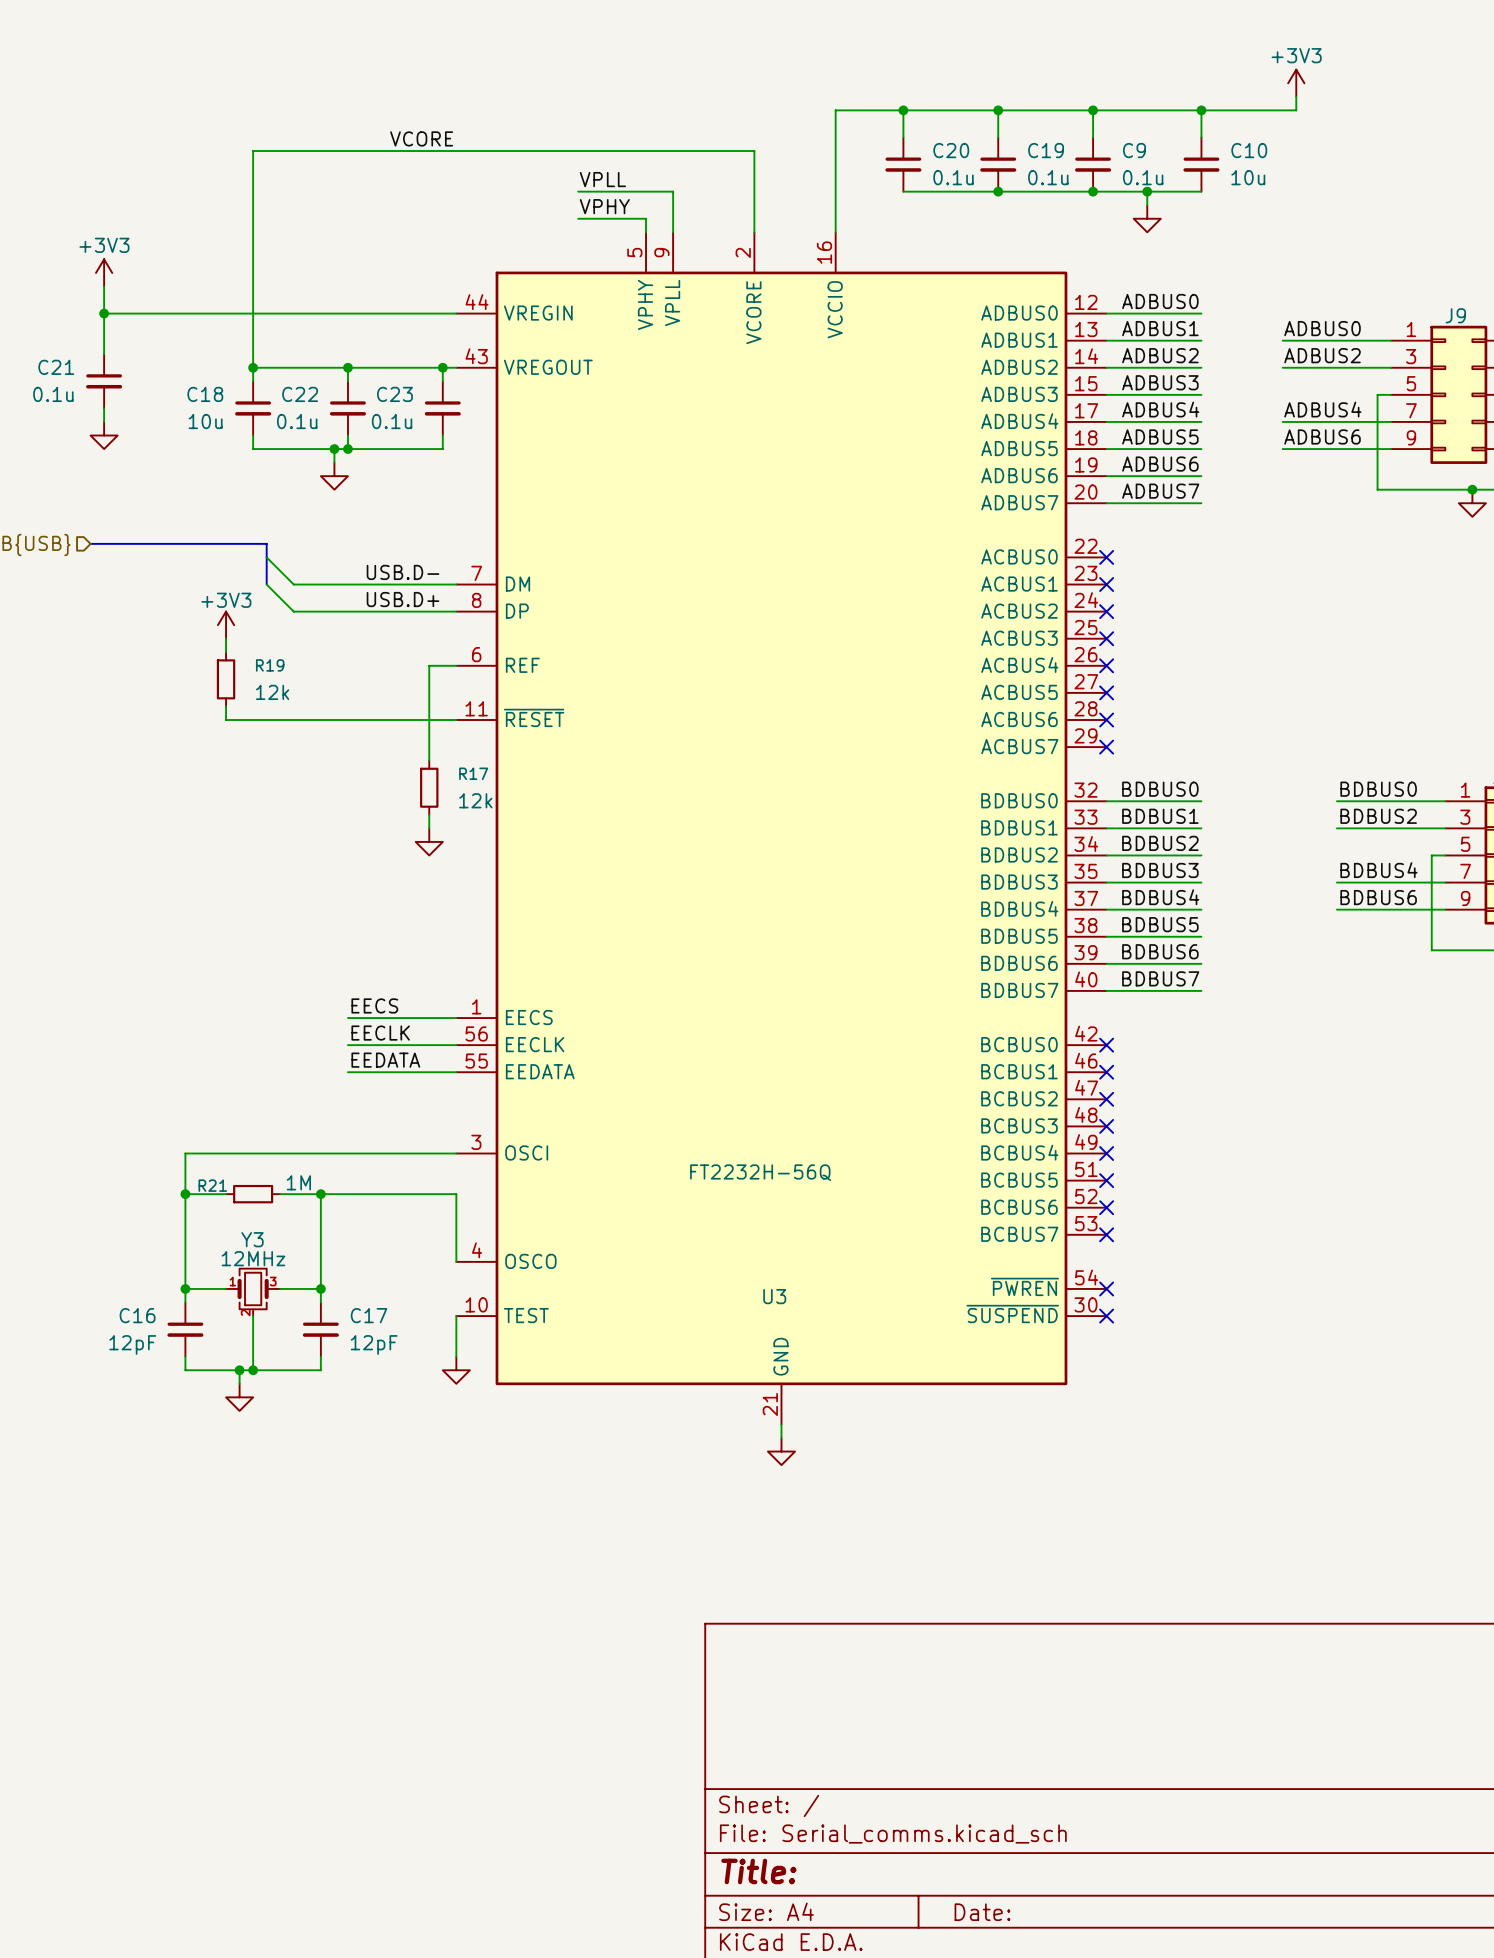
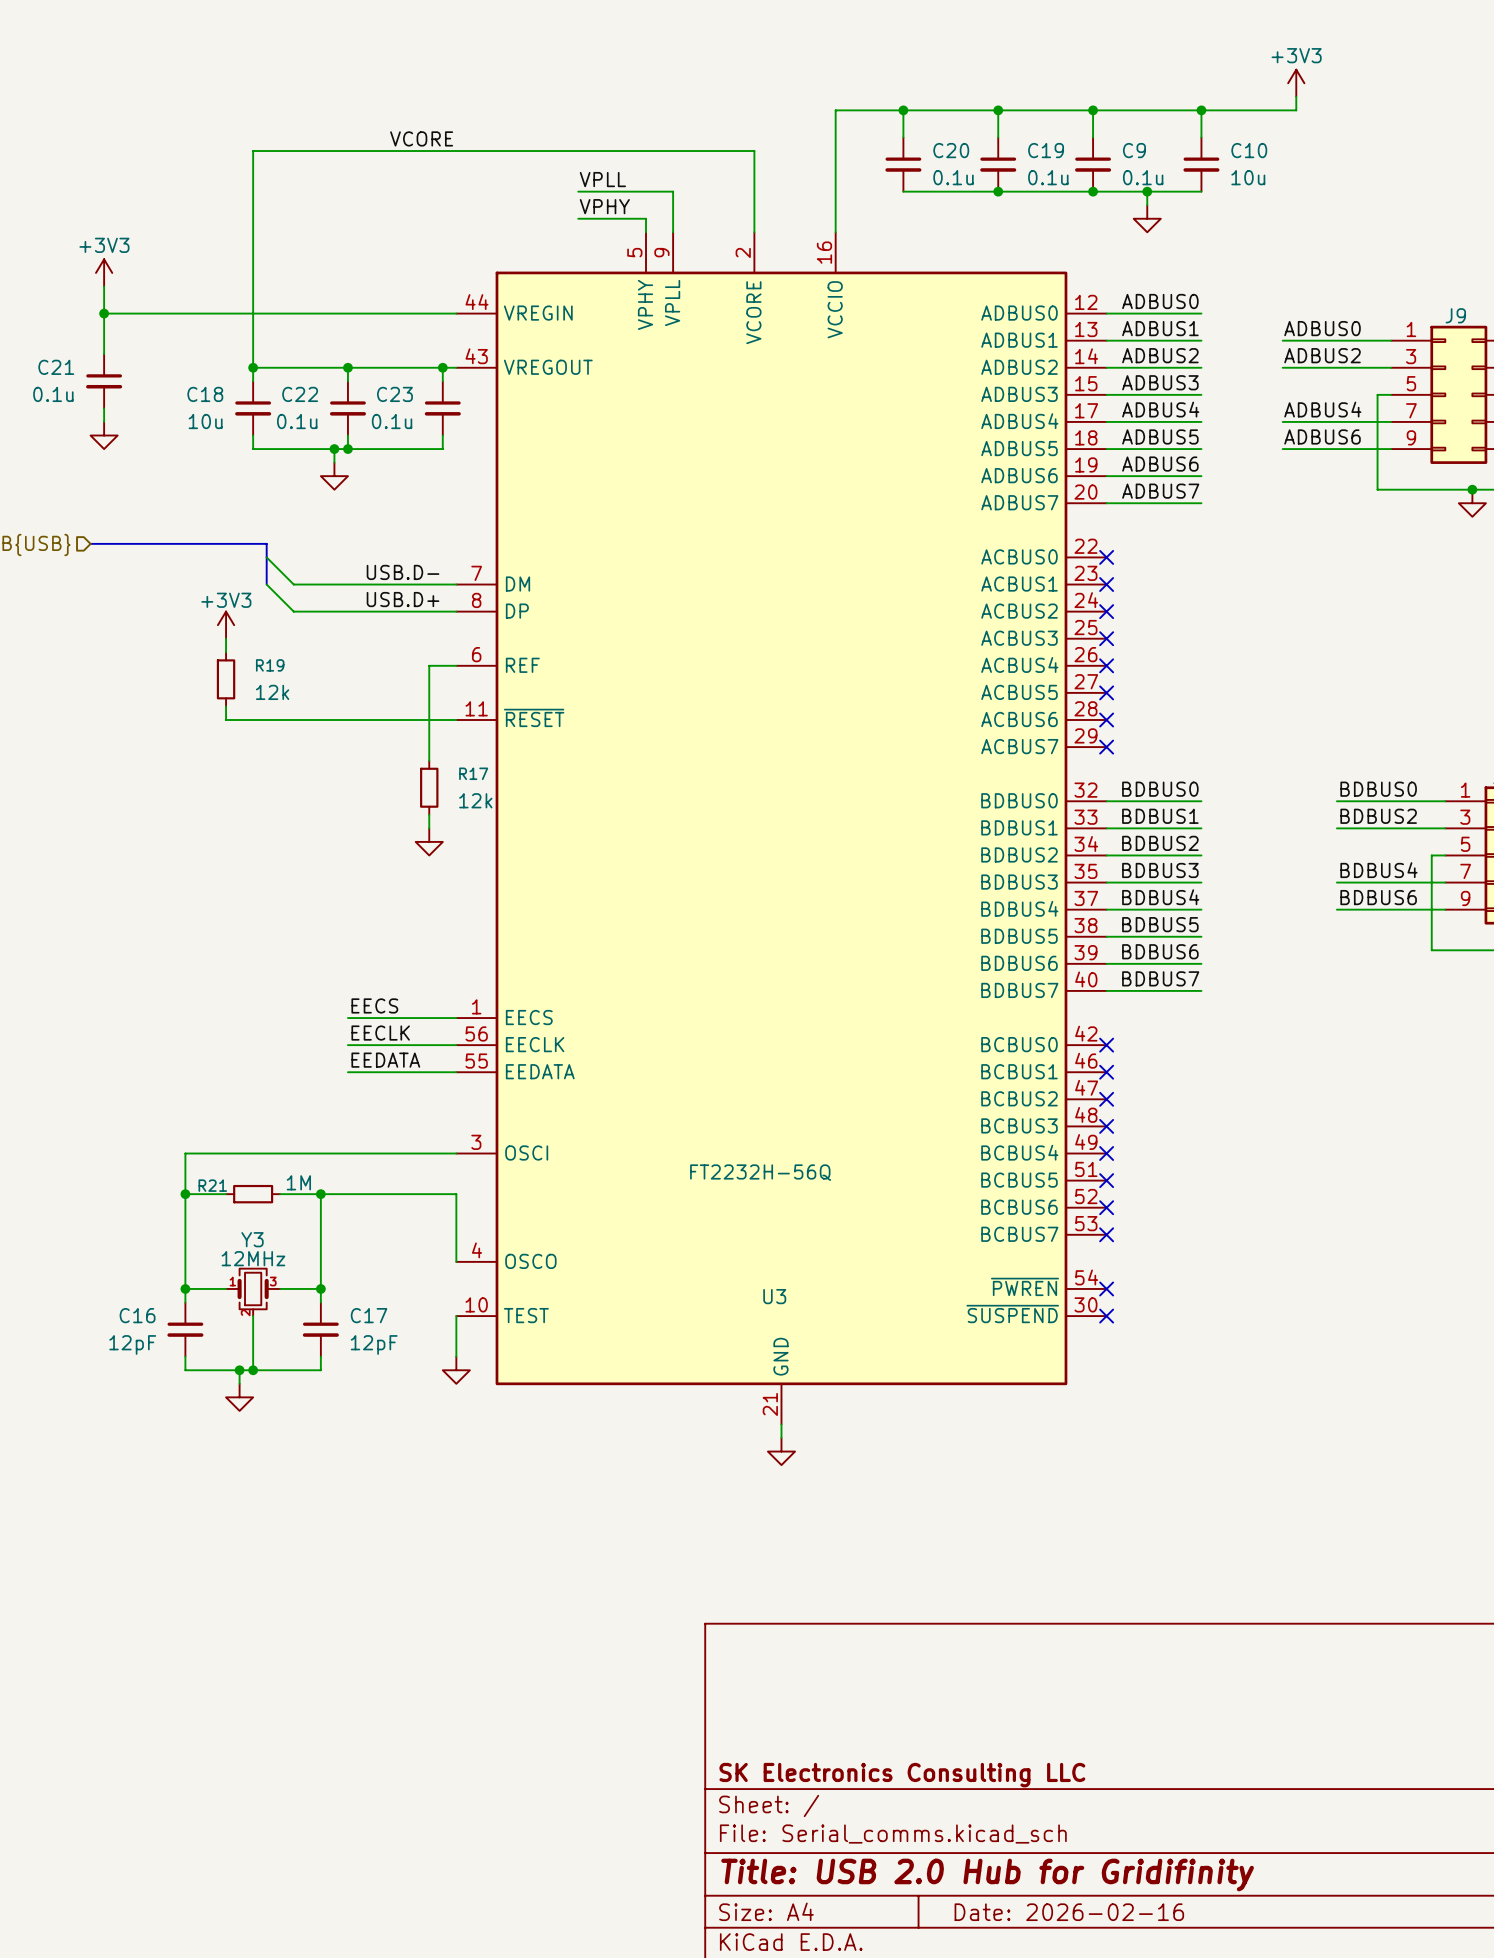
title block: none -> SK Electronics Consulting LLC (902, 1775)
title block: Title: (758, 1871) -> Title: USB 2.0 Hub for Gridifinity (987, 1875)
title block: Date: (982, 1912) -> Date: 2026-02-16 (1069, 1912)

